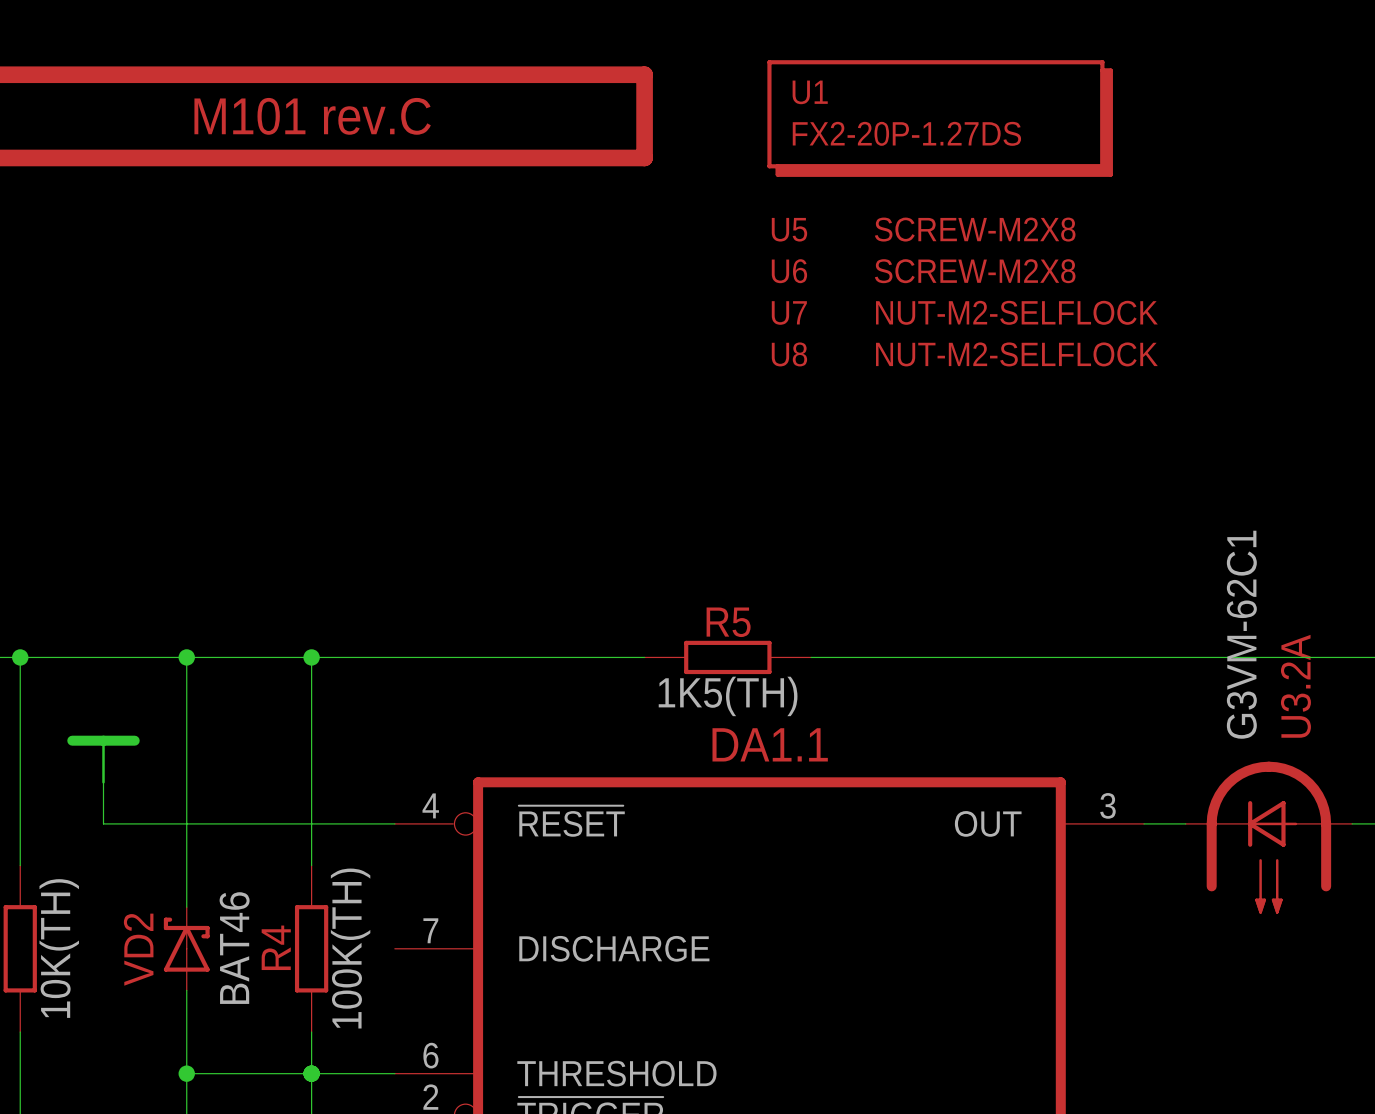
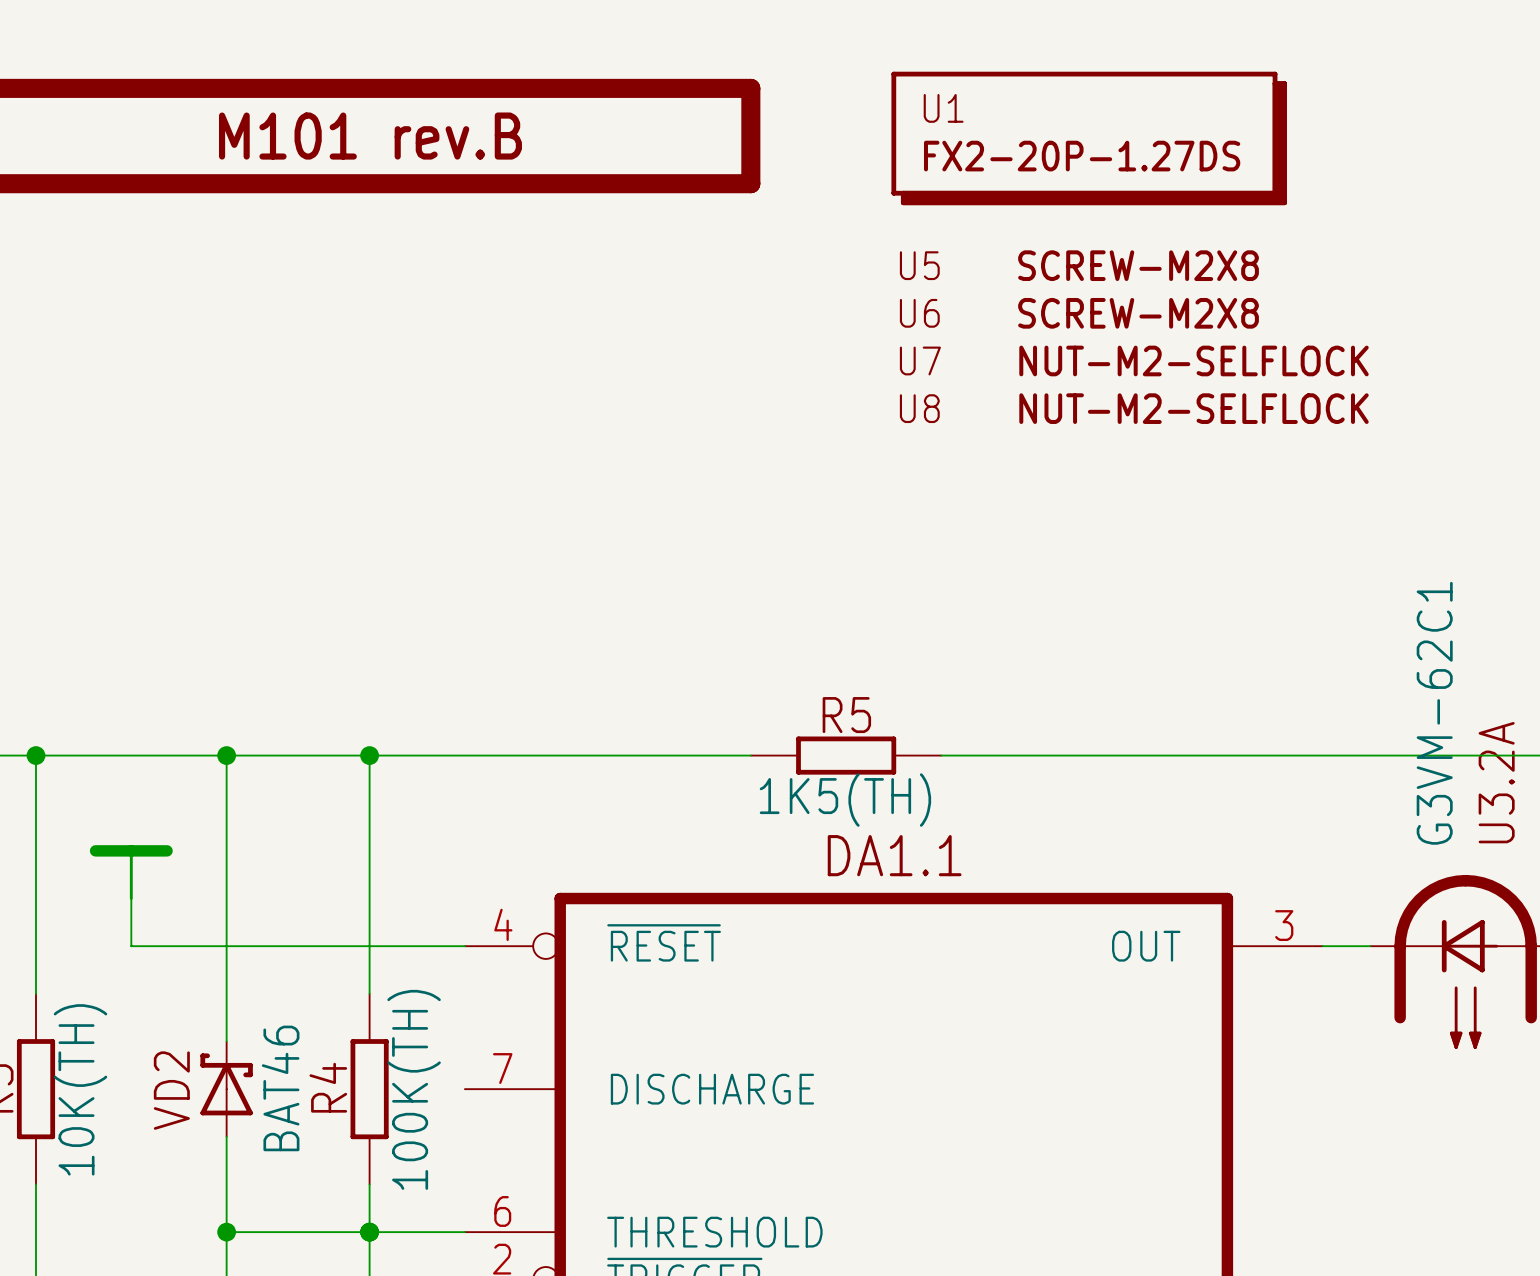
part value: M101 rev.C (312, 116) -> M101 rev.B (370, 136)

